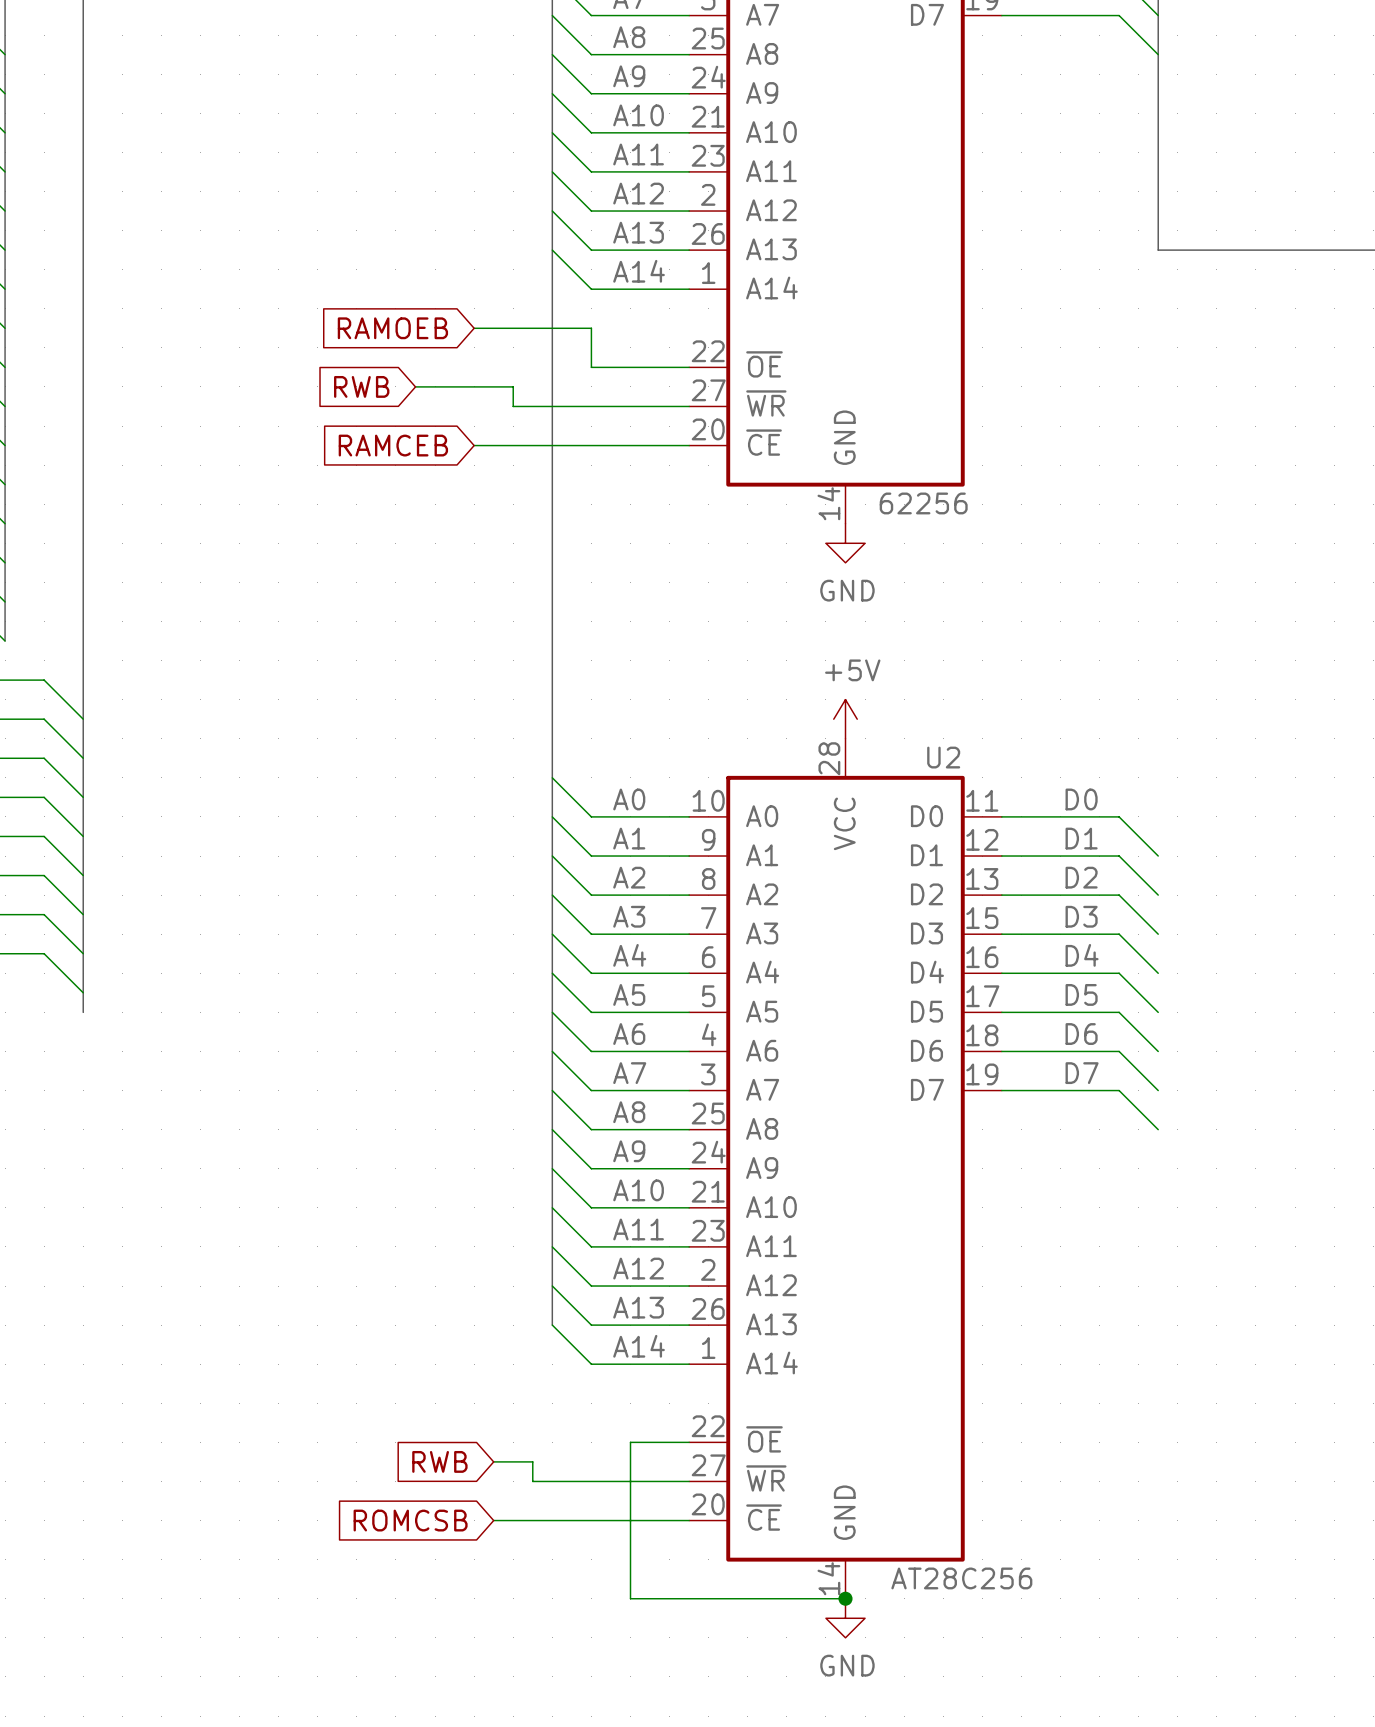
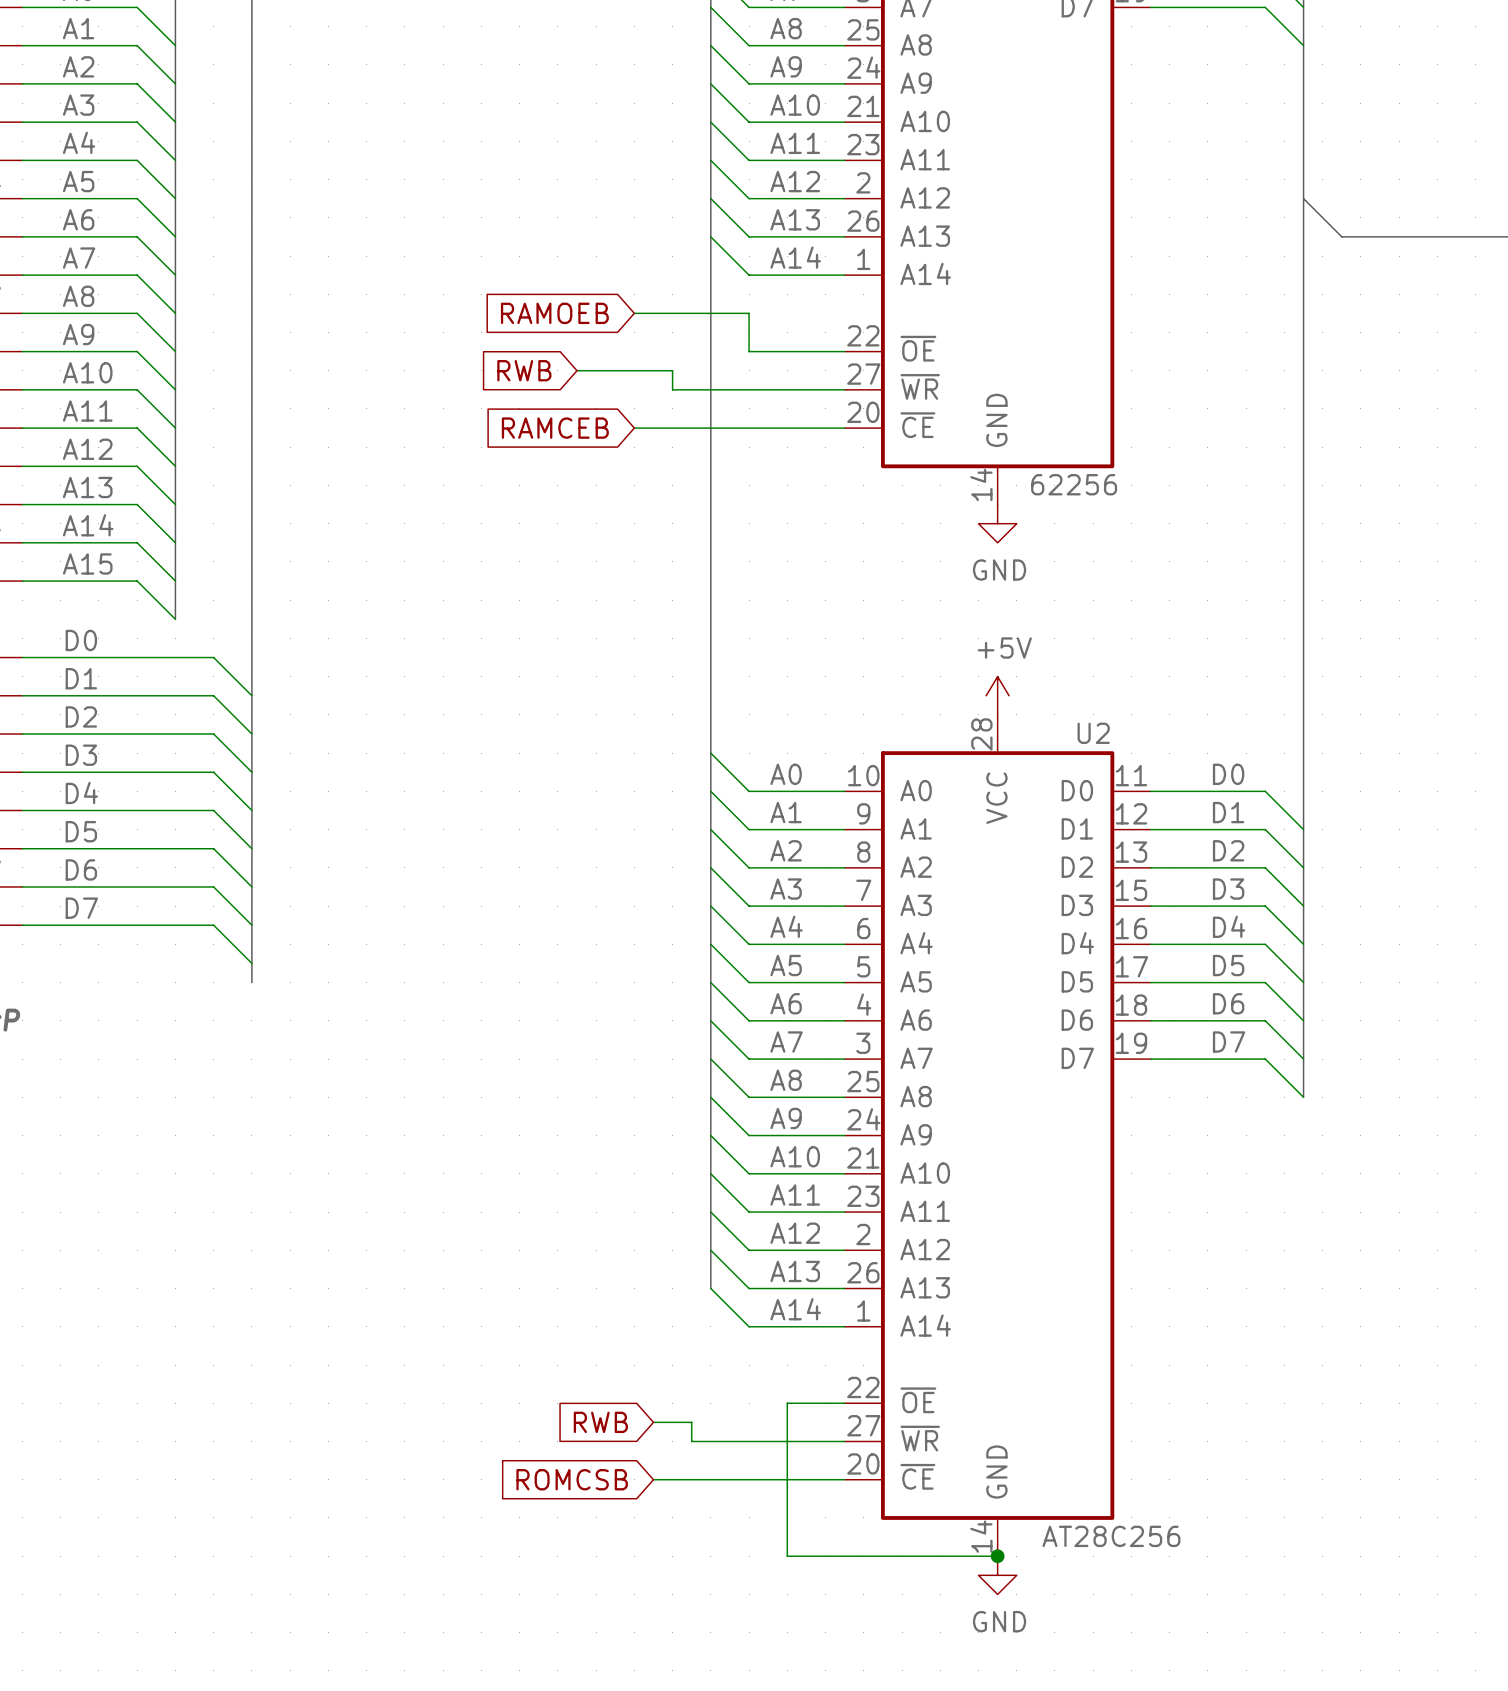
bus: (1158, 250) (1197, 250) -> (1303, 198) (1341, 236)
bus: none -> (1303, 236) (1303, 1097)

